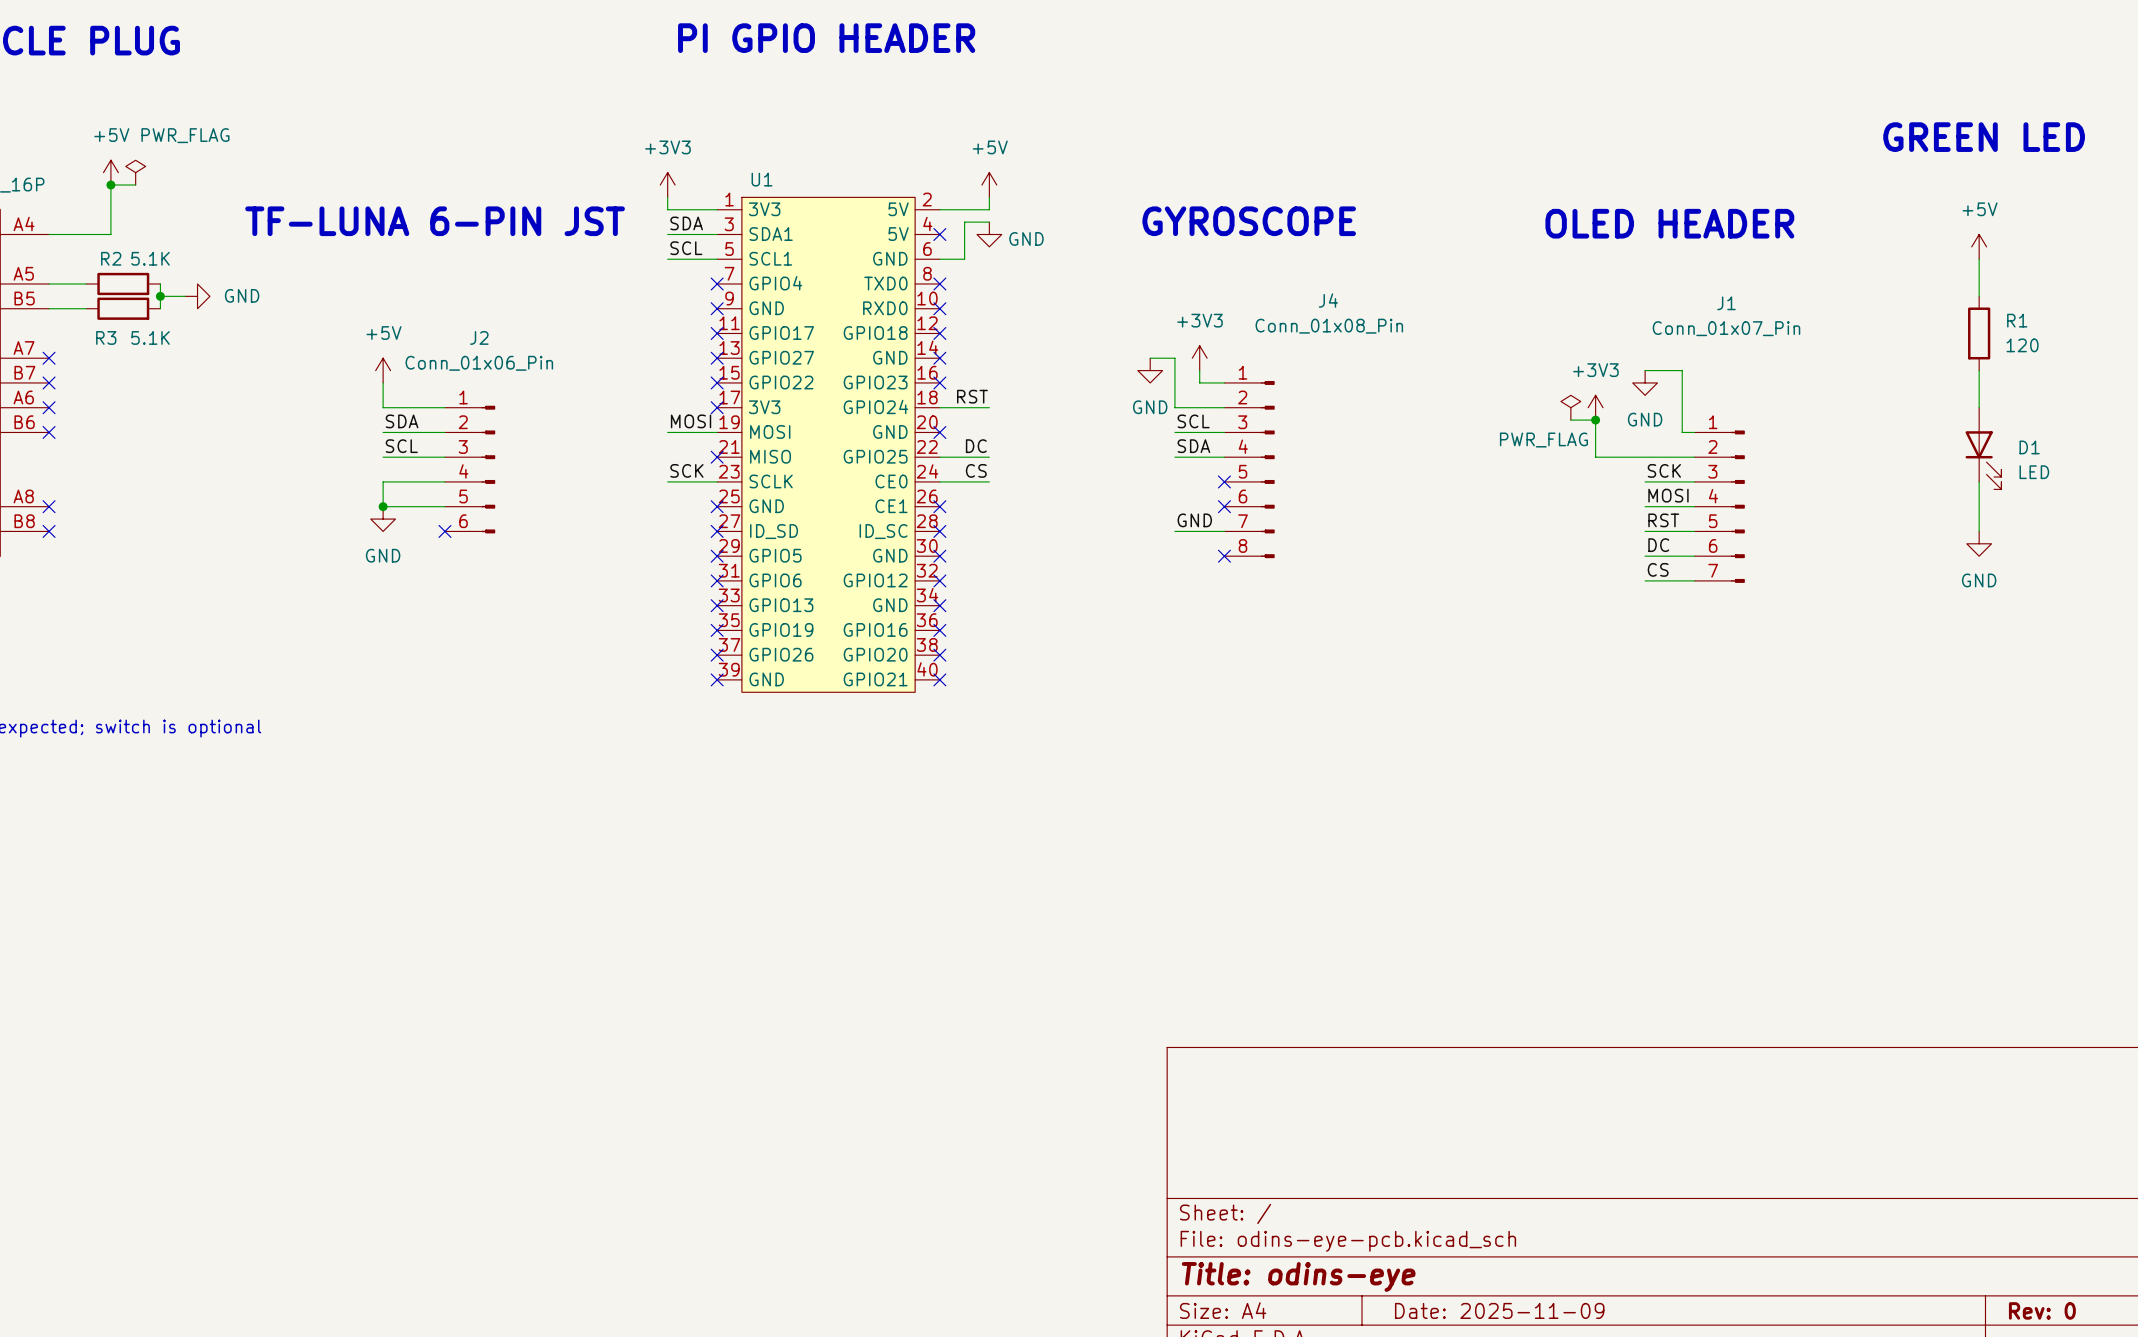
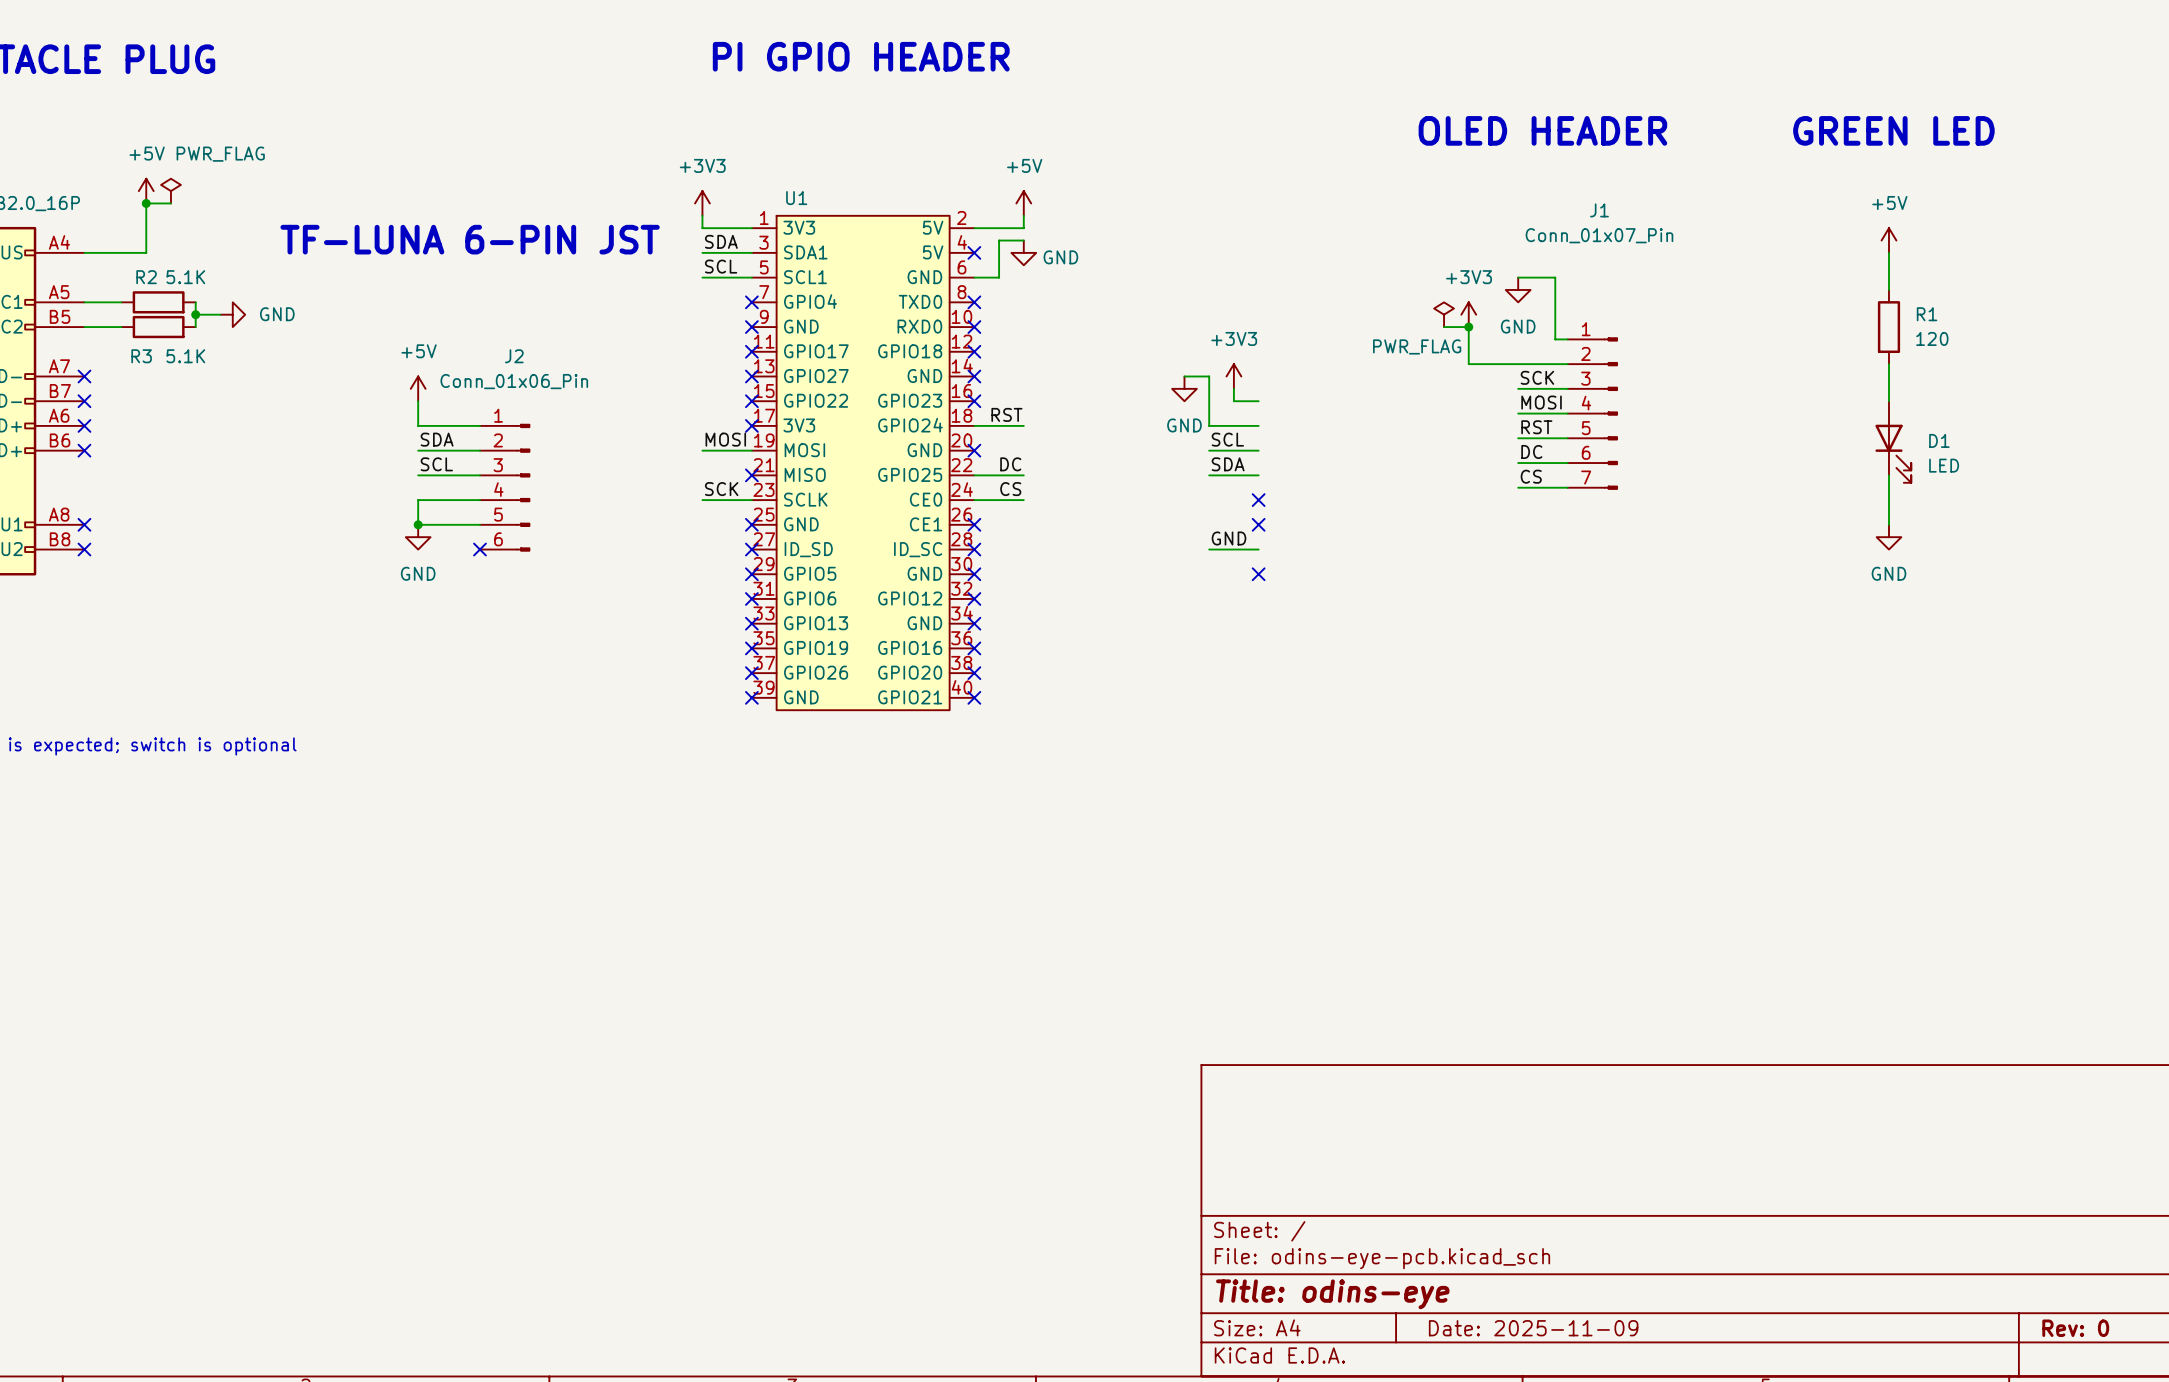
text position: GREEN LED (1984, 137) -> GREEN LED (1893, 130)
text: GYROSCOPE (1249, 221) -> none
text position: OLED HEADER (1669, 223) -> OLED HEADER (1542, 130)
power symbol position: +5V (1979, 246) -> +5V (1888, 240)
wire: (1979, 259) (1979, 296) -> (1888, 252) (1888, 289)
power symbol: none -> GND (1518, 289)
junction: none -> (1468, 327)
R1 position: (1979, 333) -> (1888, 327)
wire: (1645, 370) (1682, 370) (1682, 432) (1694, 432) -> (1518, 277) (1555, 277) (1555, 339) (1567, 339)
wire: (1979, 370) (1979, 407) -> (1888, 364) (1888, 401)
power symbol: GND (1645, 382) -> none
power symbol position: PWR_FLAG (1570, 407) -> PWR_FLAG (1444, 314)
power symbol position: +3V3 (1595, 407) -> +3V3 (1468, 314)
wire: (1570, 420) (1595, 420) (1595, 457) (1694, 457) -> (1444, 327) (1468, 327) (1468, 364) (1567, 364)
junction: (1595, 420) -> none
D1 position: (1983, 448) -> (1893, 442)
J4: Conn_01x08_Pin (1249, 469) -> none
label position: SCK (1664, 470) -> SCK (1537, 377)
wire: (1645, 481) (1694, 481) -> (1518, 388) (1567, 388)
wire: (1979, 481) (1979, 531) -> (1888, 475) (1888, 524)
label position: MOSI (1668, 495) -> MOSI (1541, 402)
wire: (1645, 506) (1694, 506) -> (1518, 413) (1567, 413)
J1 position: (1719, 506) -> (1592, 413)
power symbol: none -> GND (1888, 537)
label position: RST (1663, 520) -> RST (1536, 427)
wire: (1645, 531) (1694, 531) -> (1518, 438) (1567, 438)
power symbol: GND (1979, 543) -> none
label position: DC (1658, 545) -> DC (1531, 451)
wire: (1645, 556) (1694, 556) -> (1518, 463) (1567, 463)
label position: CS (1658, 569) -> CS (1531, 476)
wire: (1645, 580) (1694, 580) -> (1518, 487) (1567, 487)

